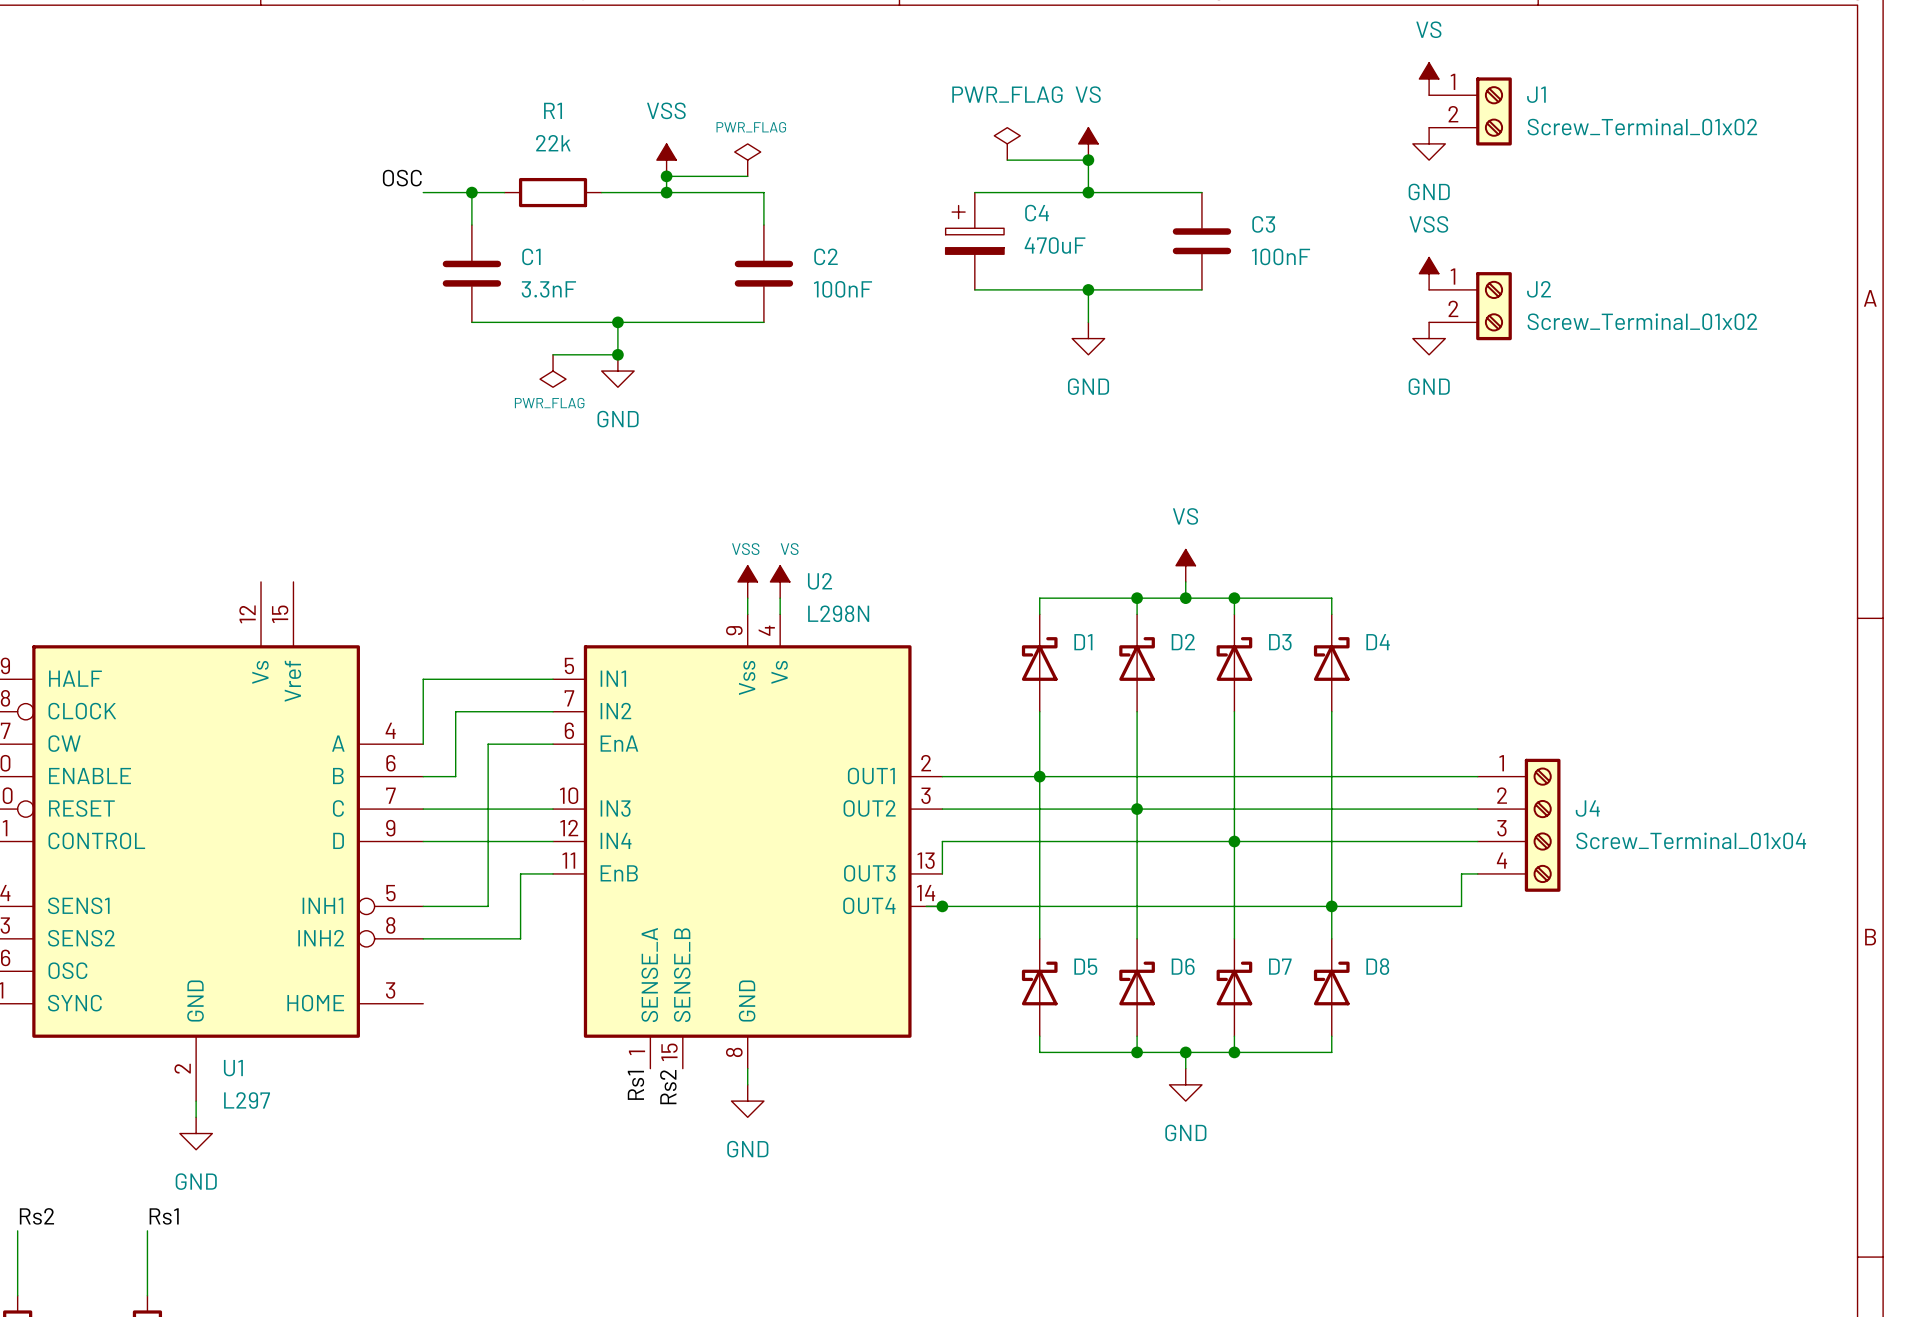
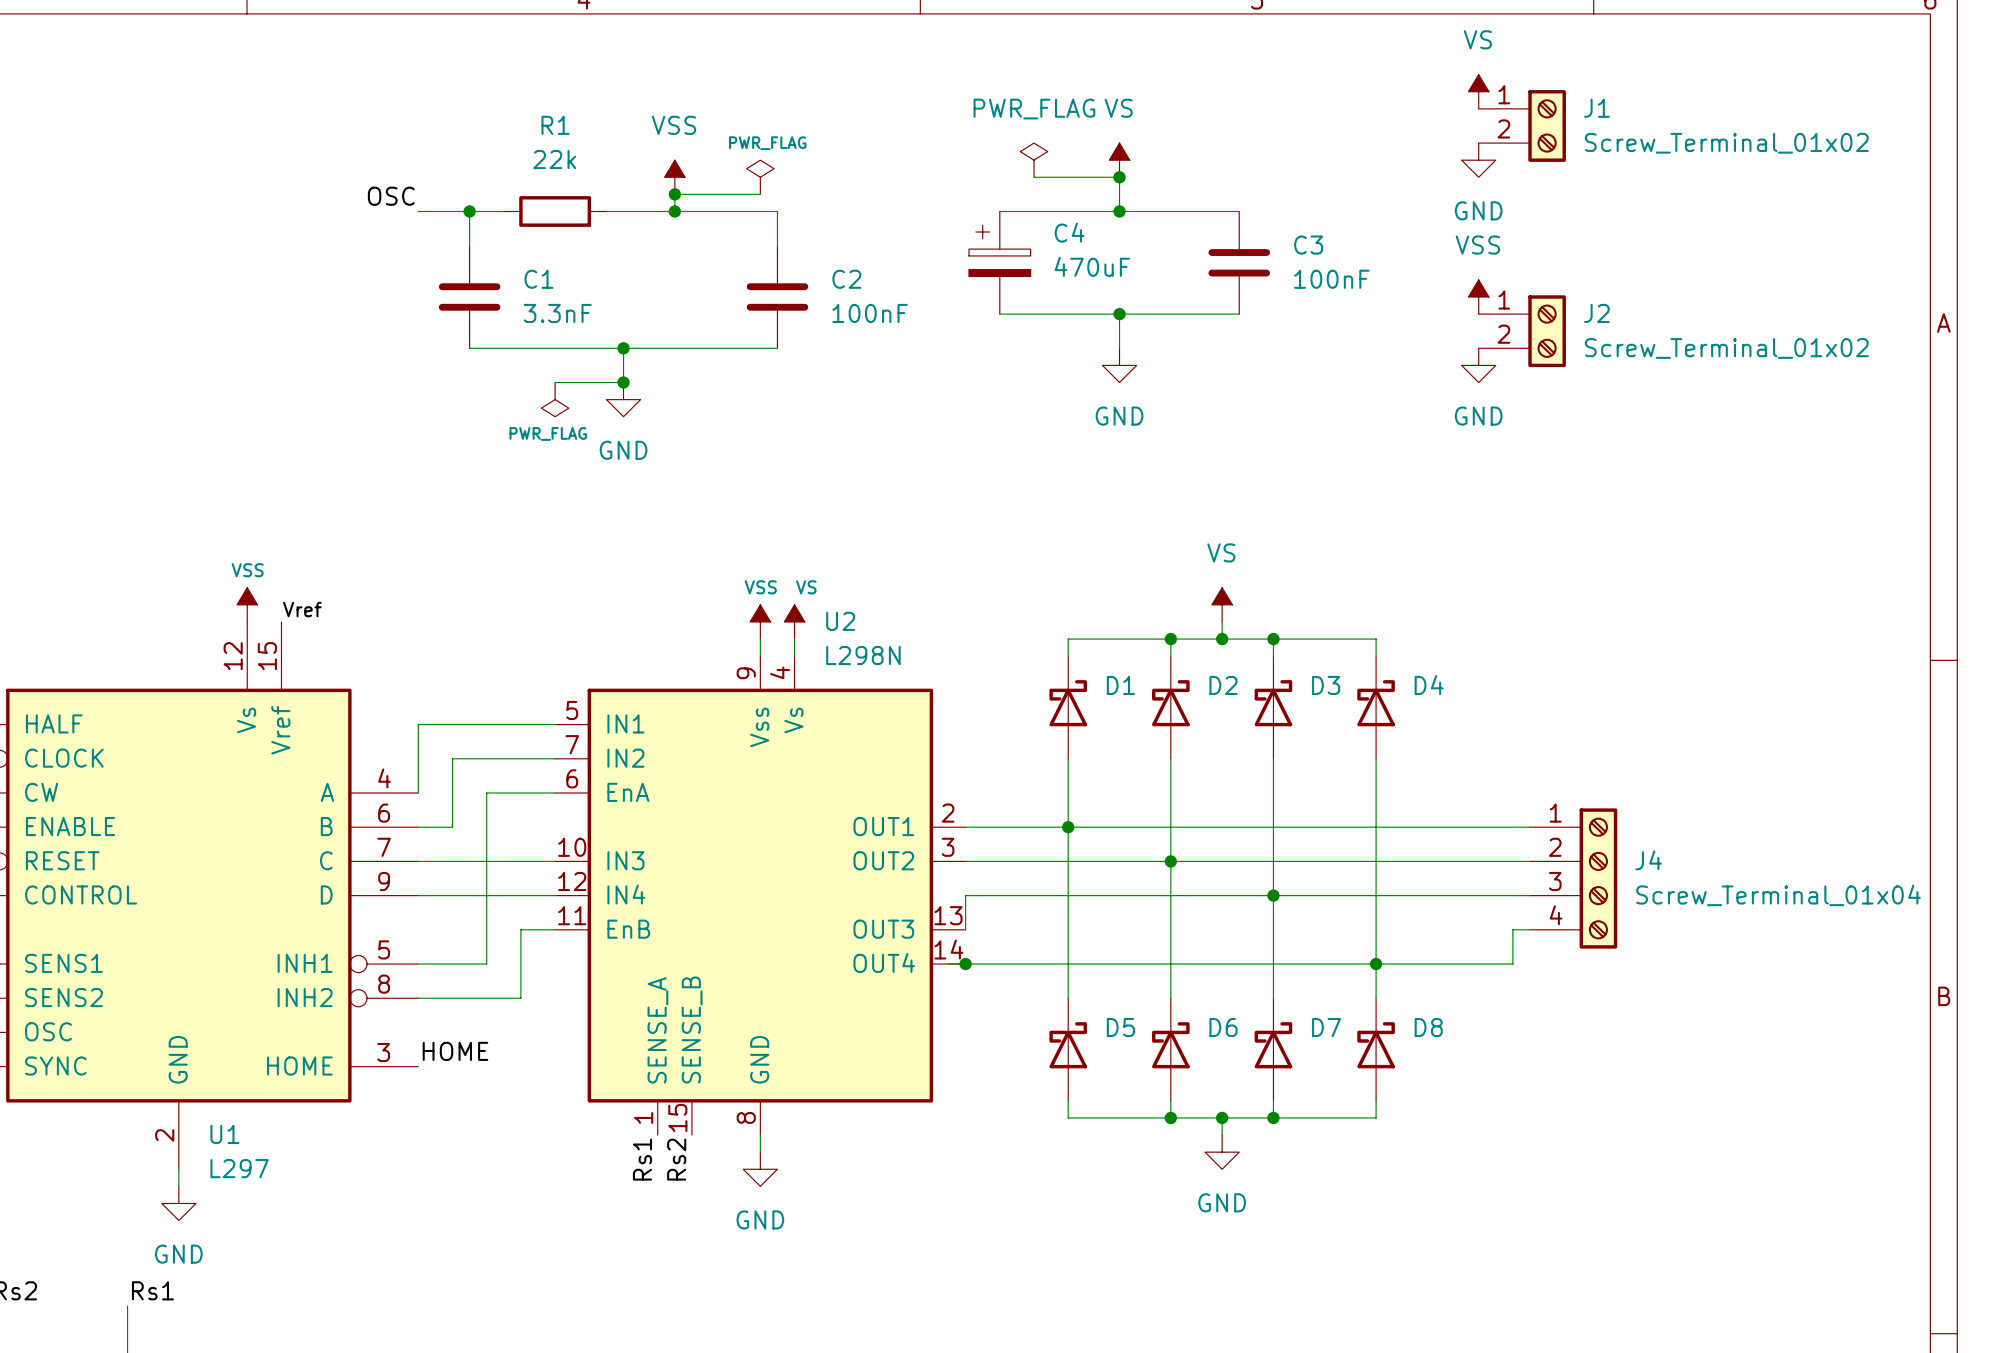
power symbol: none -> VSS (247, 604)
label: none -> Vref (302, 609)
label: none -> HOME (455, 1051)

